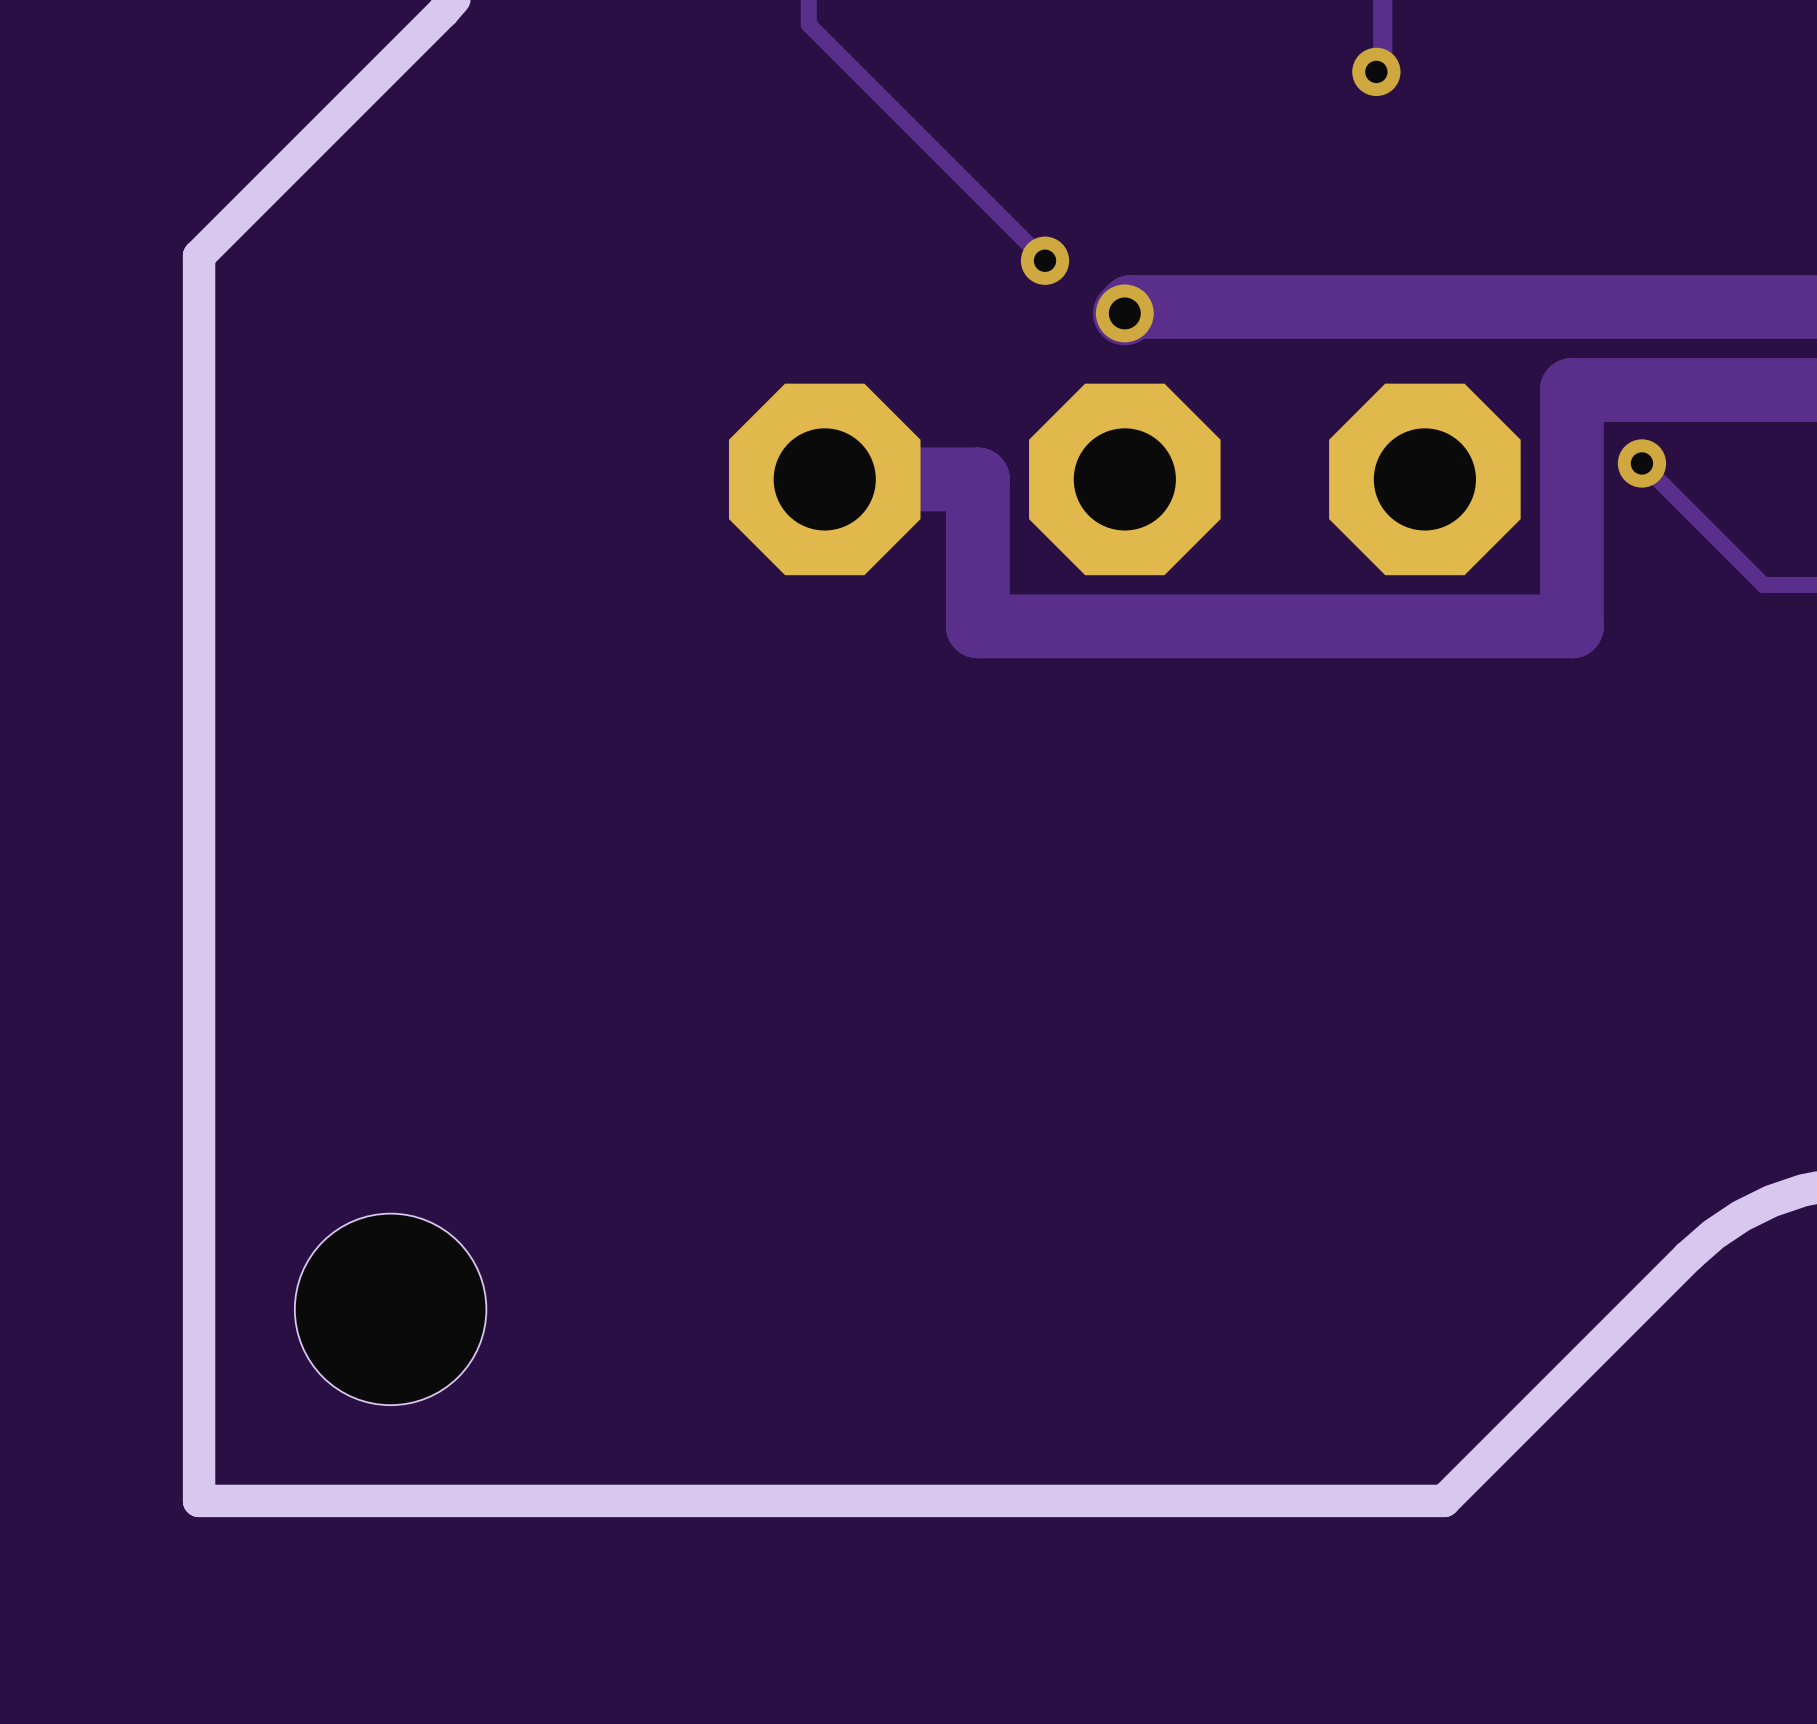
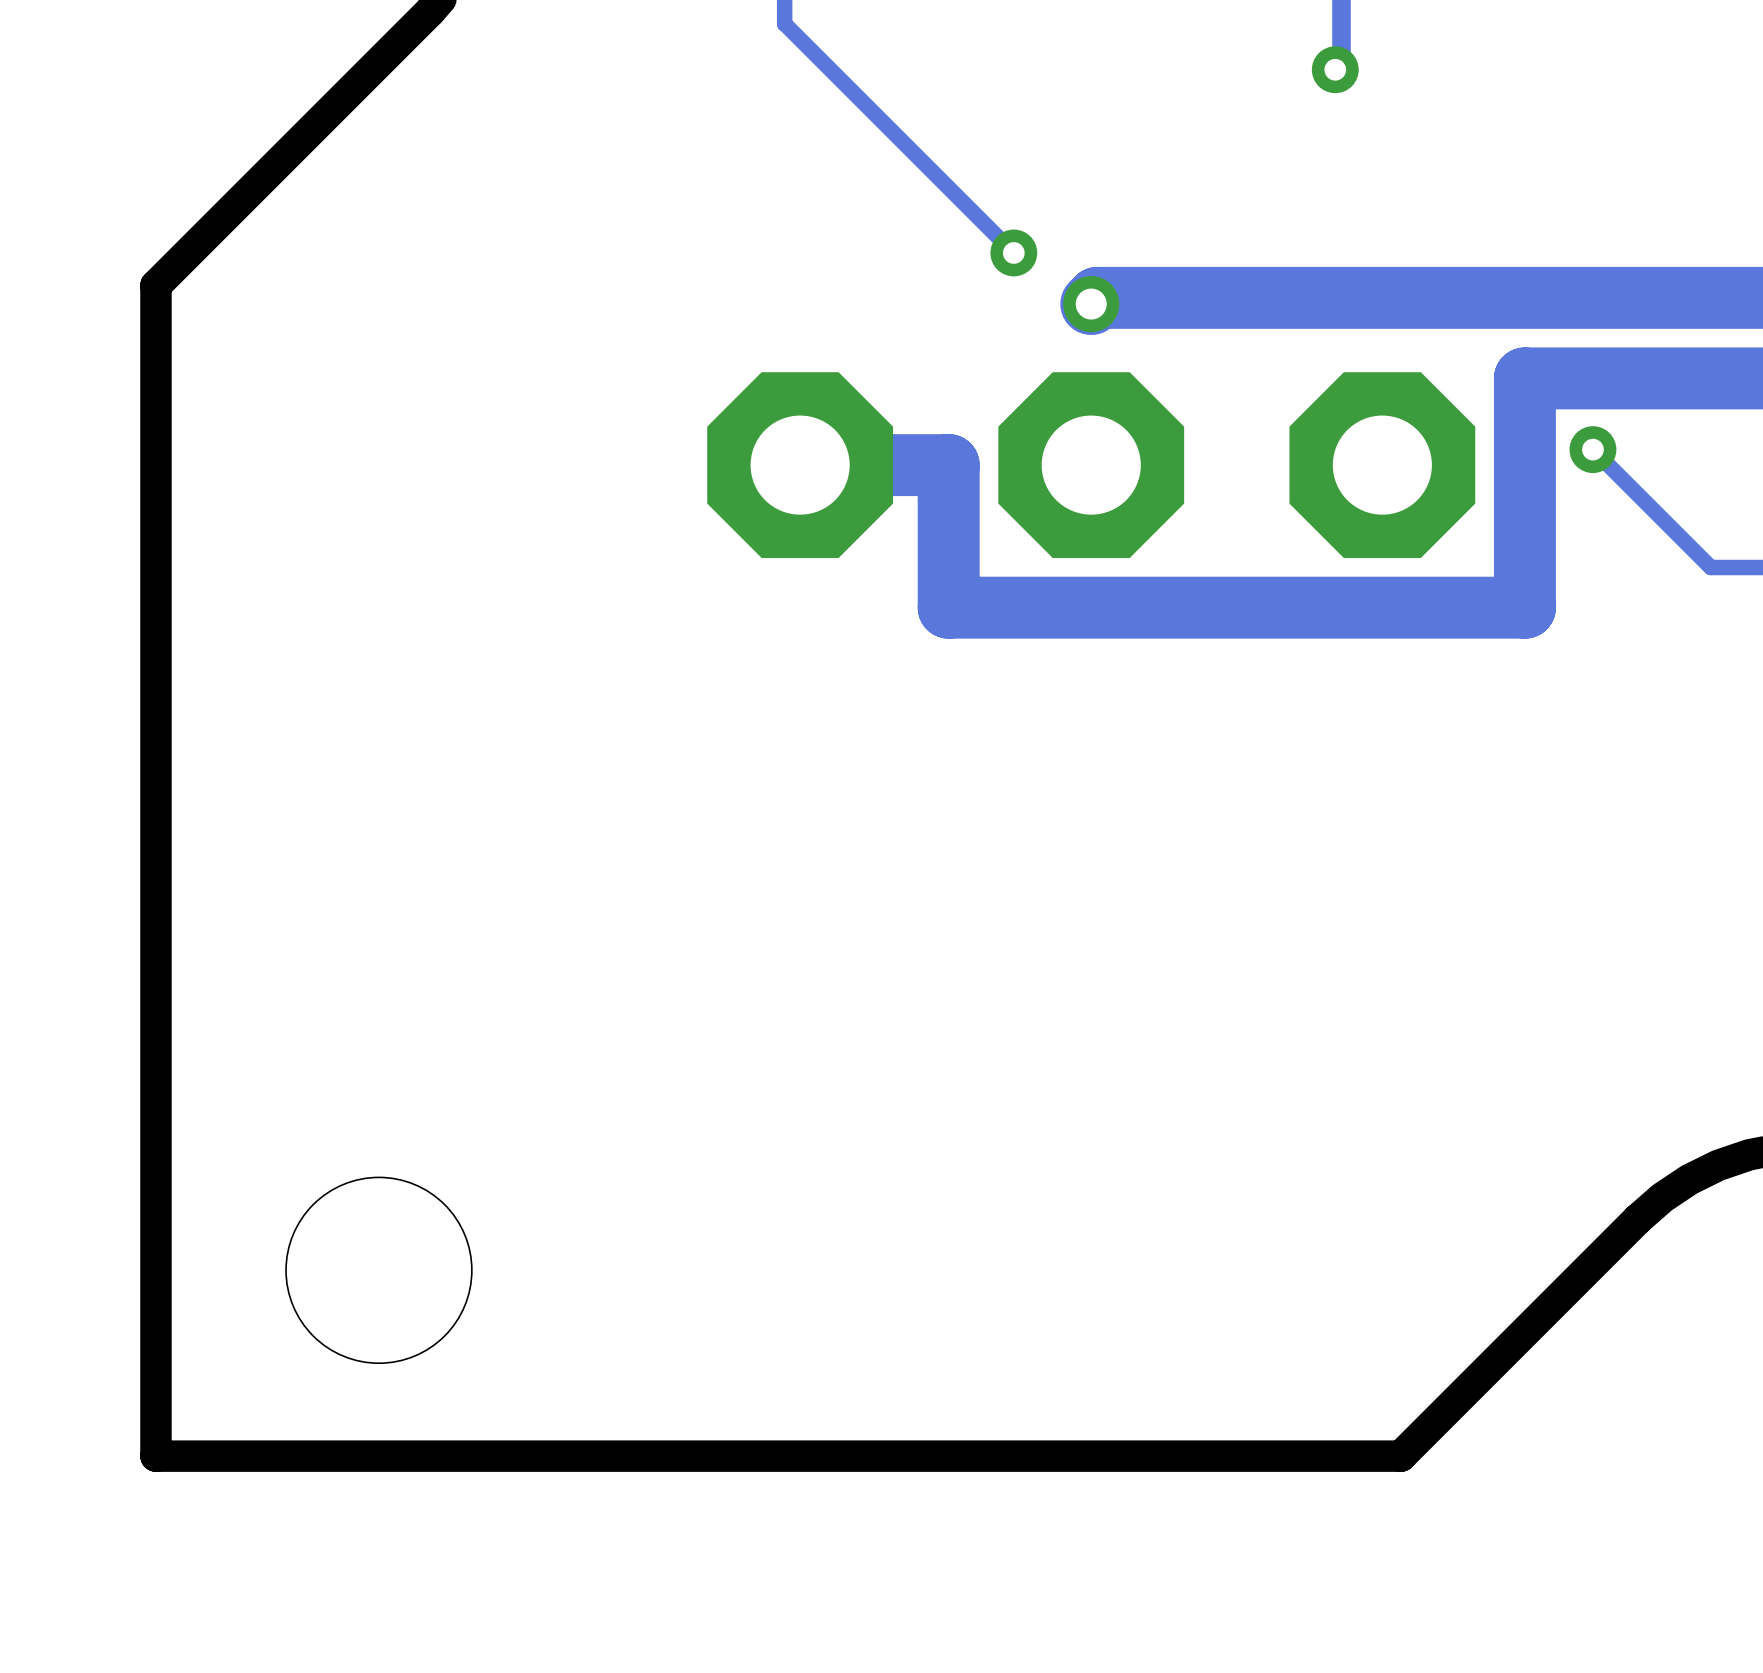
board edge: (199, 255) (199, 1500) -> (193, 248) (155, 285) (155, 1456) (193, 1456)

